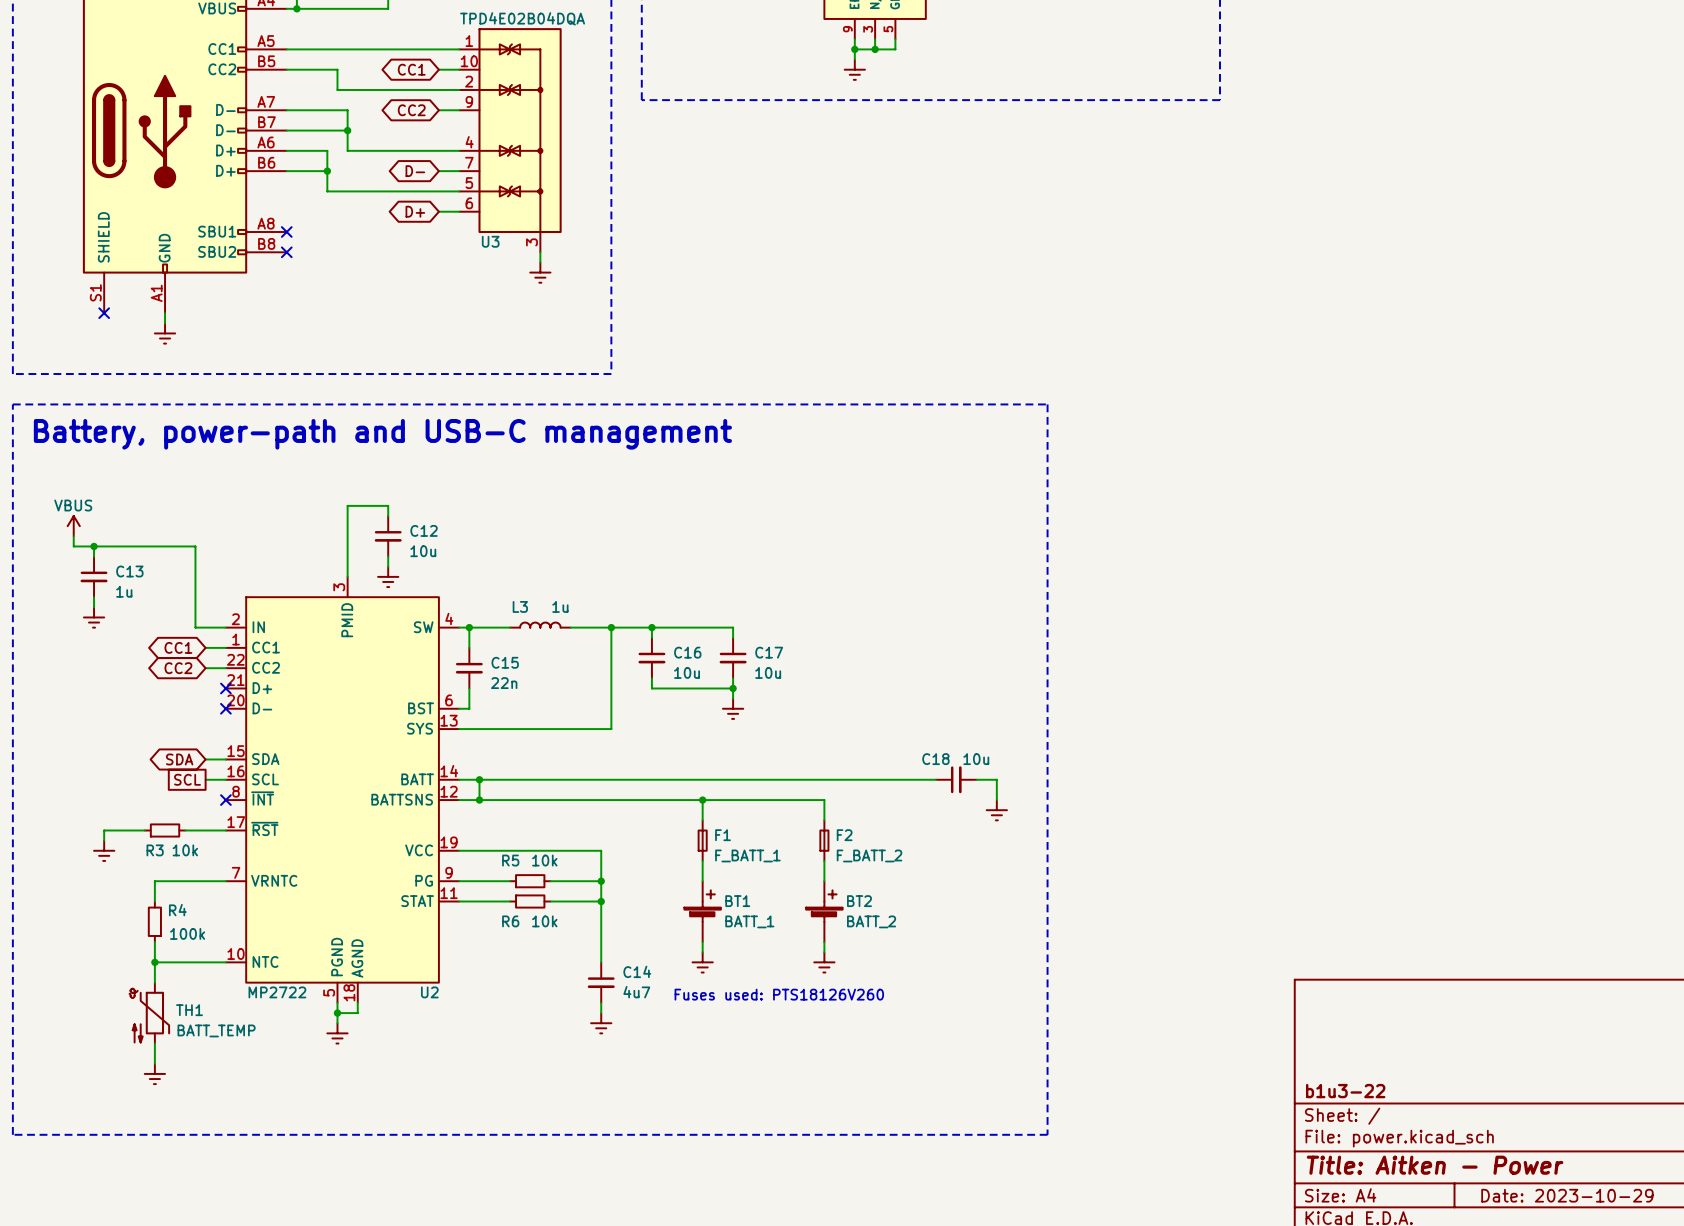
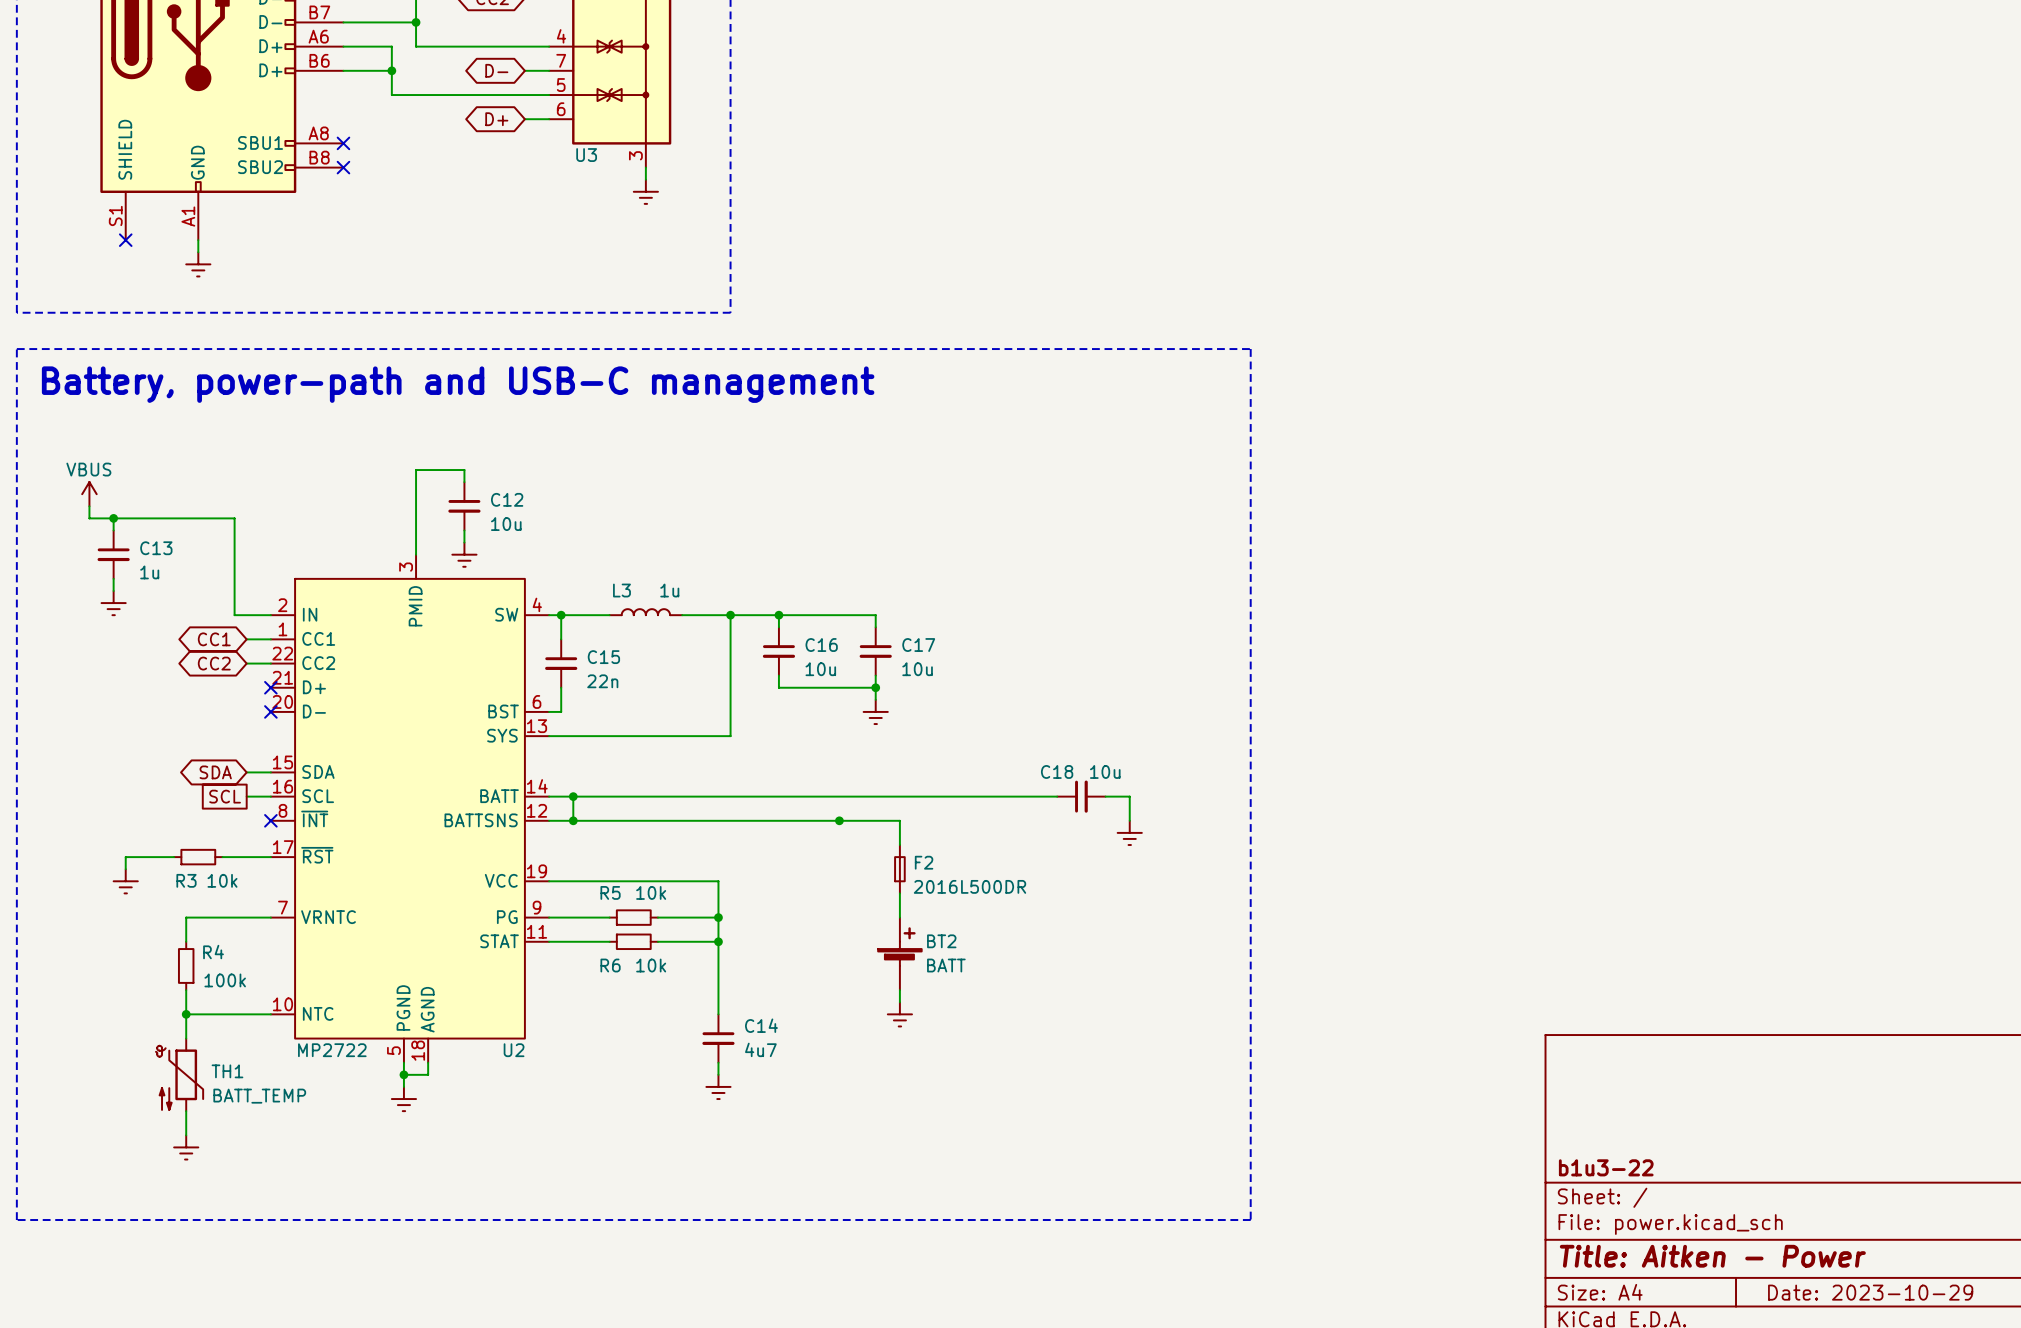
wire: none -> (1117, 796) (1129, 796) (1129, 820)
C18 position: (956, 779) -> (1081, 796)
wire: (976, 779) (996, 779) (996, 800) -> none
wire: (702, 800) (702, 820) -> none
wire: (753, 800) (824, 800) (824, 820) -> (899, 820) (899, 845)
power symbol position: (996, 810) -> (1129, 832)
F1: F_BATT_1 (702, 840) -> none
F2 position: (824, 840) -> (899, 869)
F2 value: F_BATT_2 (869, 855) -> 2016L500DR (969, 886)
wire: (702, 860) (702, 881) -> (899, 893) (899, 917)
wire: (824, 860) (824, 881) -> none
BT1: BATT_1 (702, 911) -> none
BT2 position: (824, 911) -> (899, 953)
BT2 value: BATT_2 (871, 921) -> BATT (946, 965)
wire: (702, 942) (702, 952) -> (899, 990) (899, 1002)
wire: (824, 942) (824, 952) -> none
power symbol: (702, 962) -> none
power symbol: none -> (899, 1014)
power symbol: (824, 962) -> none
text: Fuses used: PTS18126V260 (779, 994) -> none

